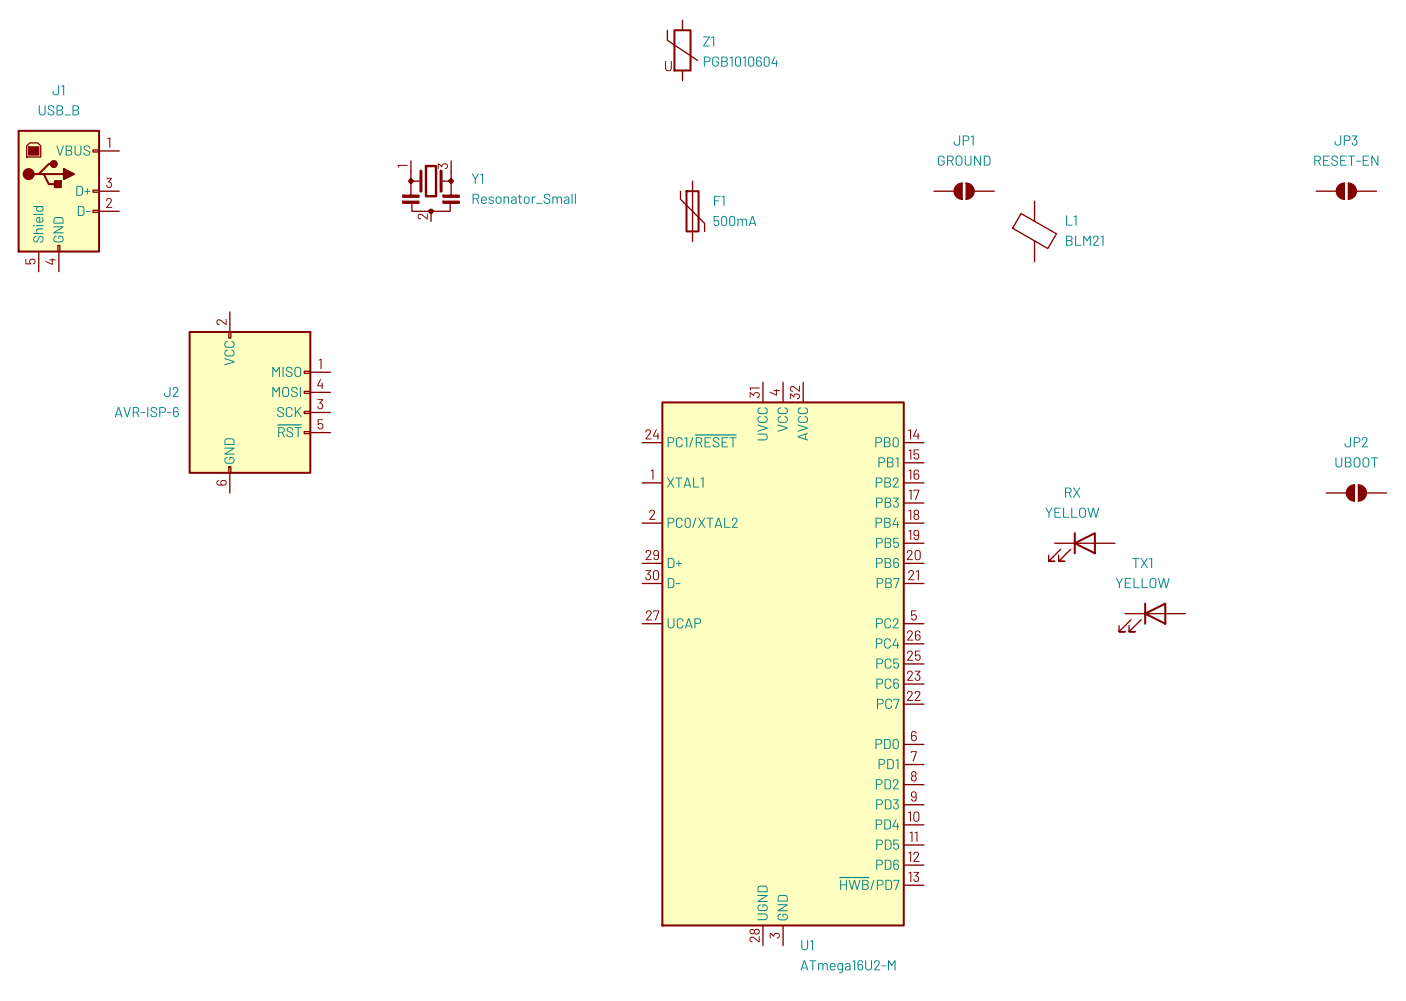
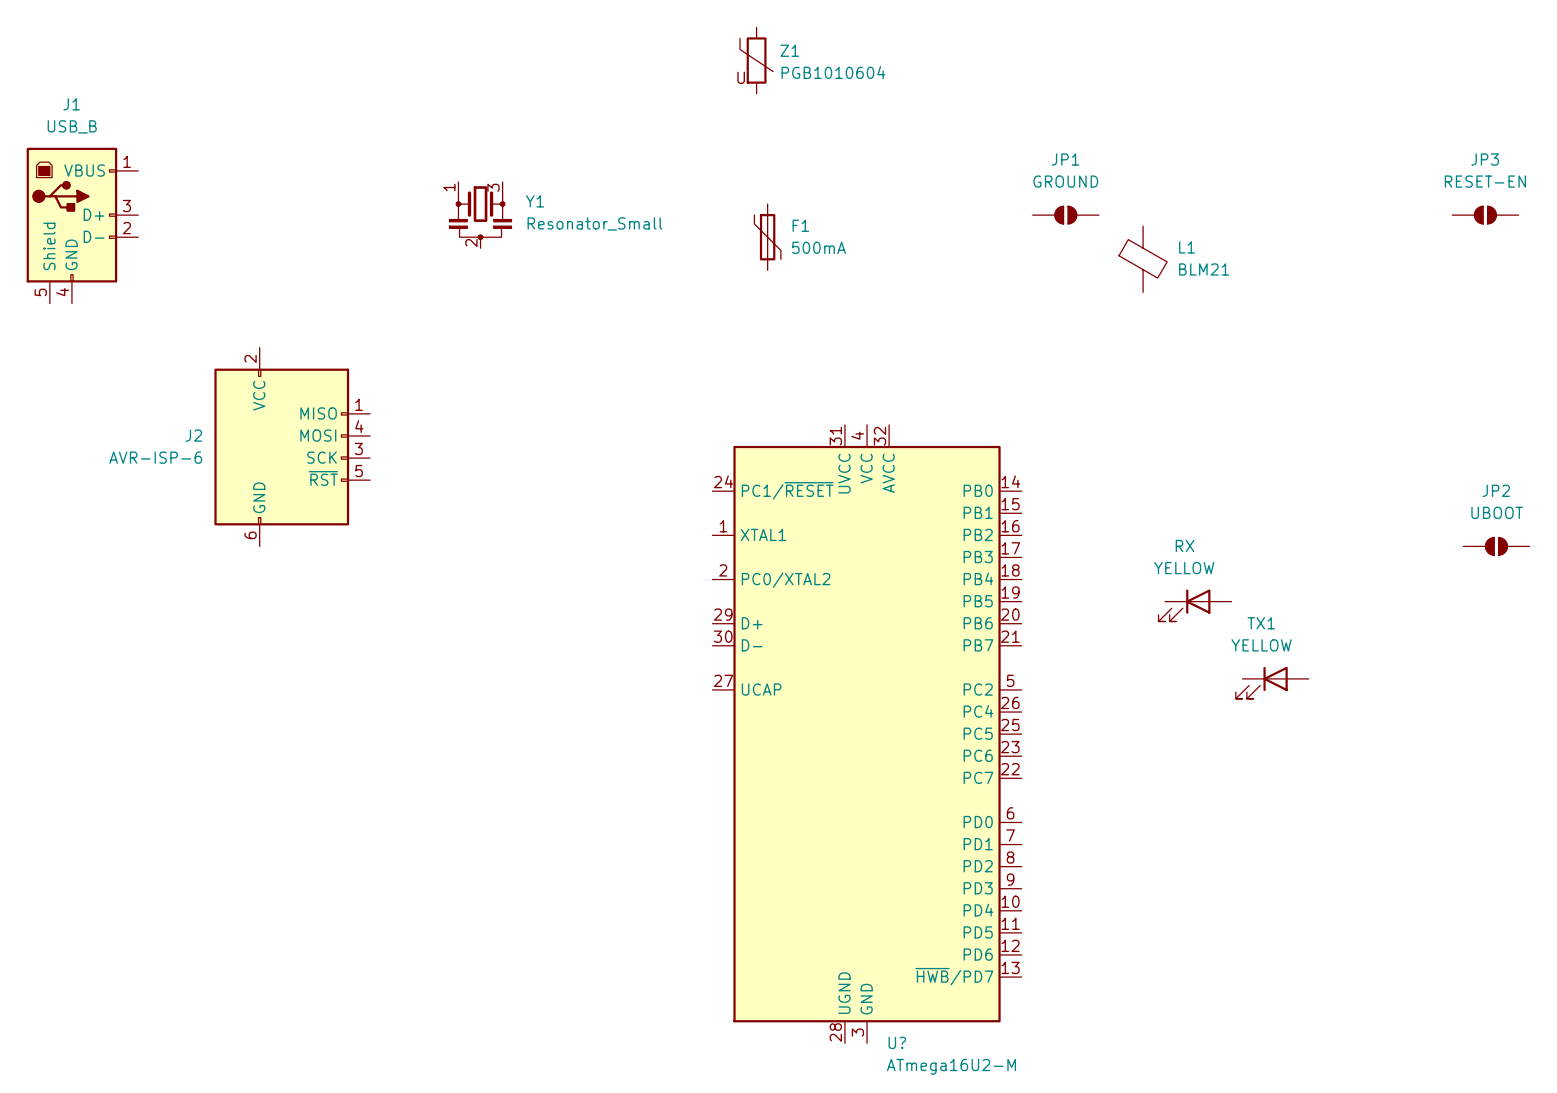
U1 name: U1 (807, 945) -> U? (897, 1042)

